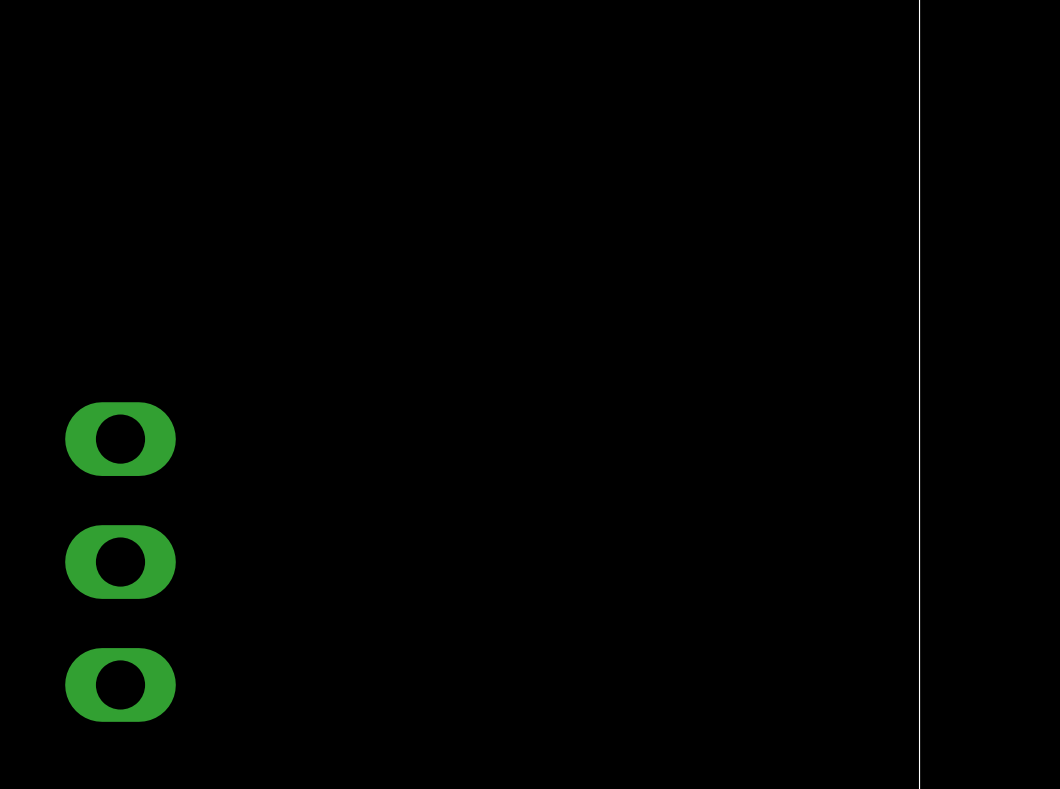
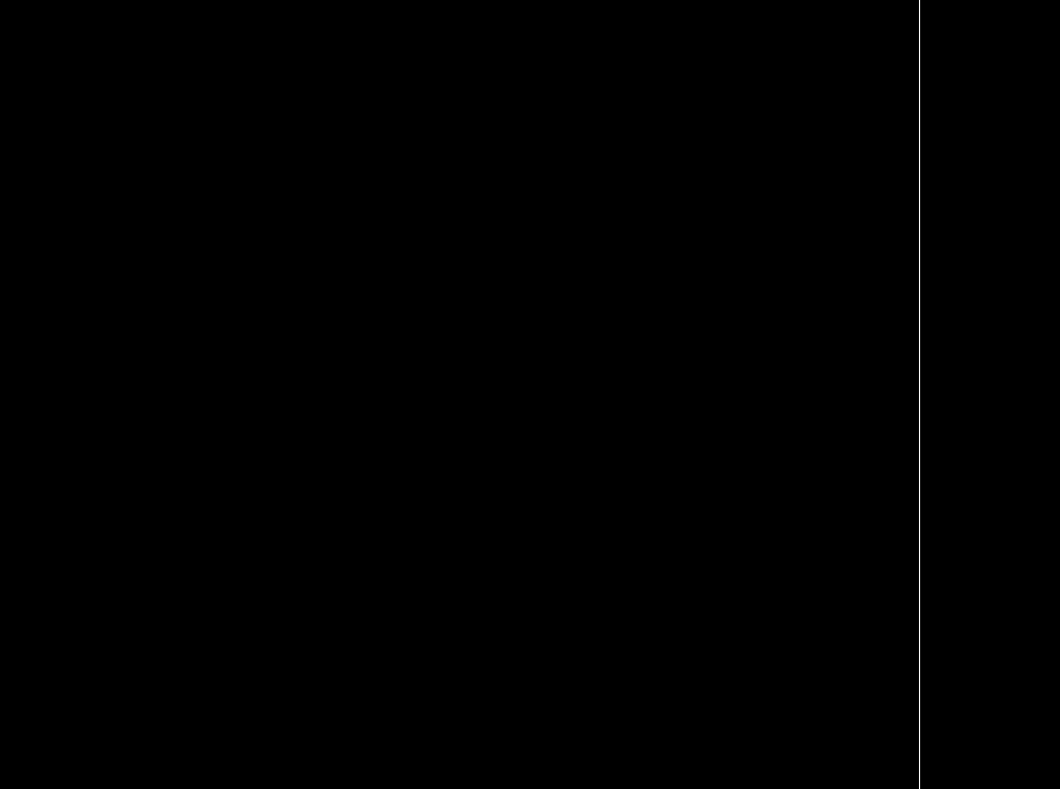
part: (120, 562) -> none

